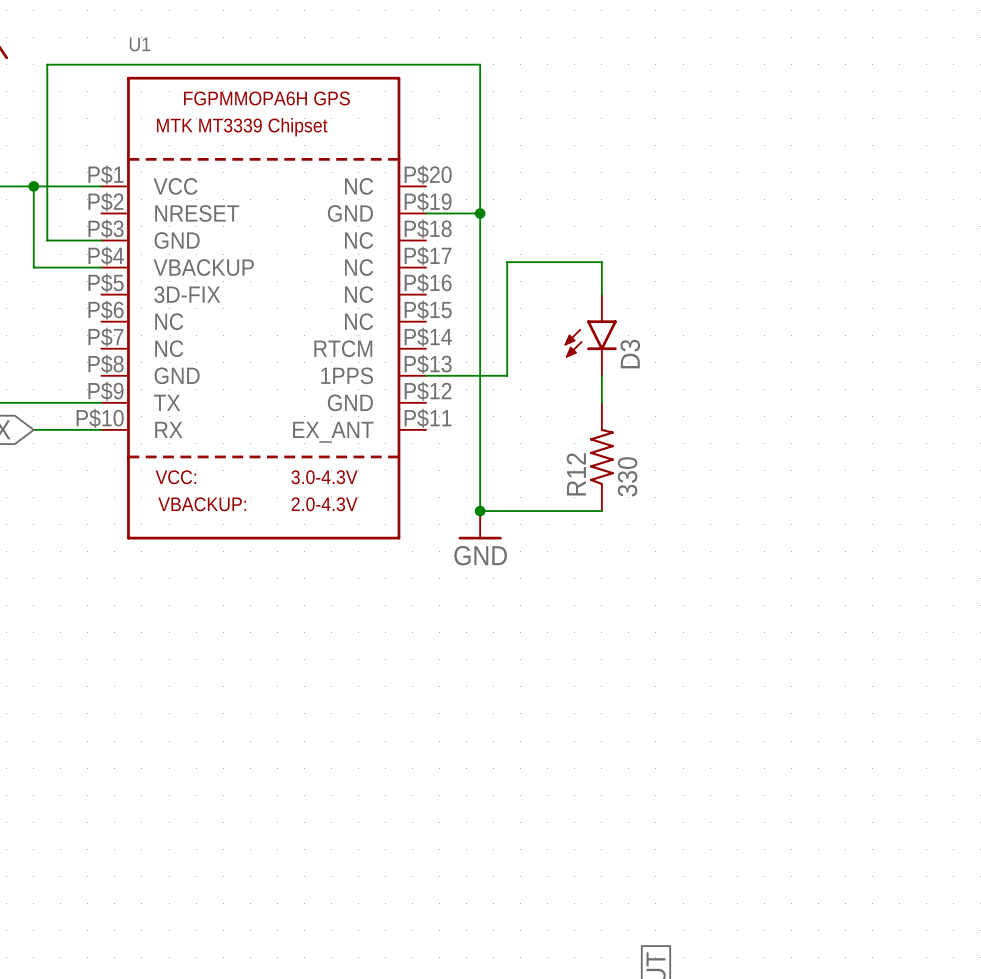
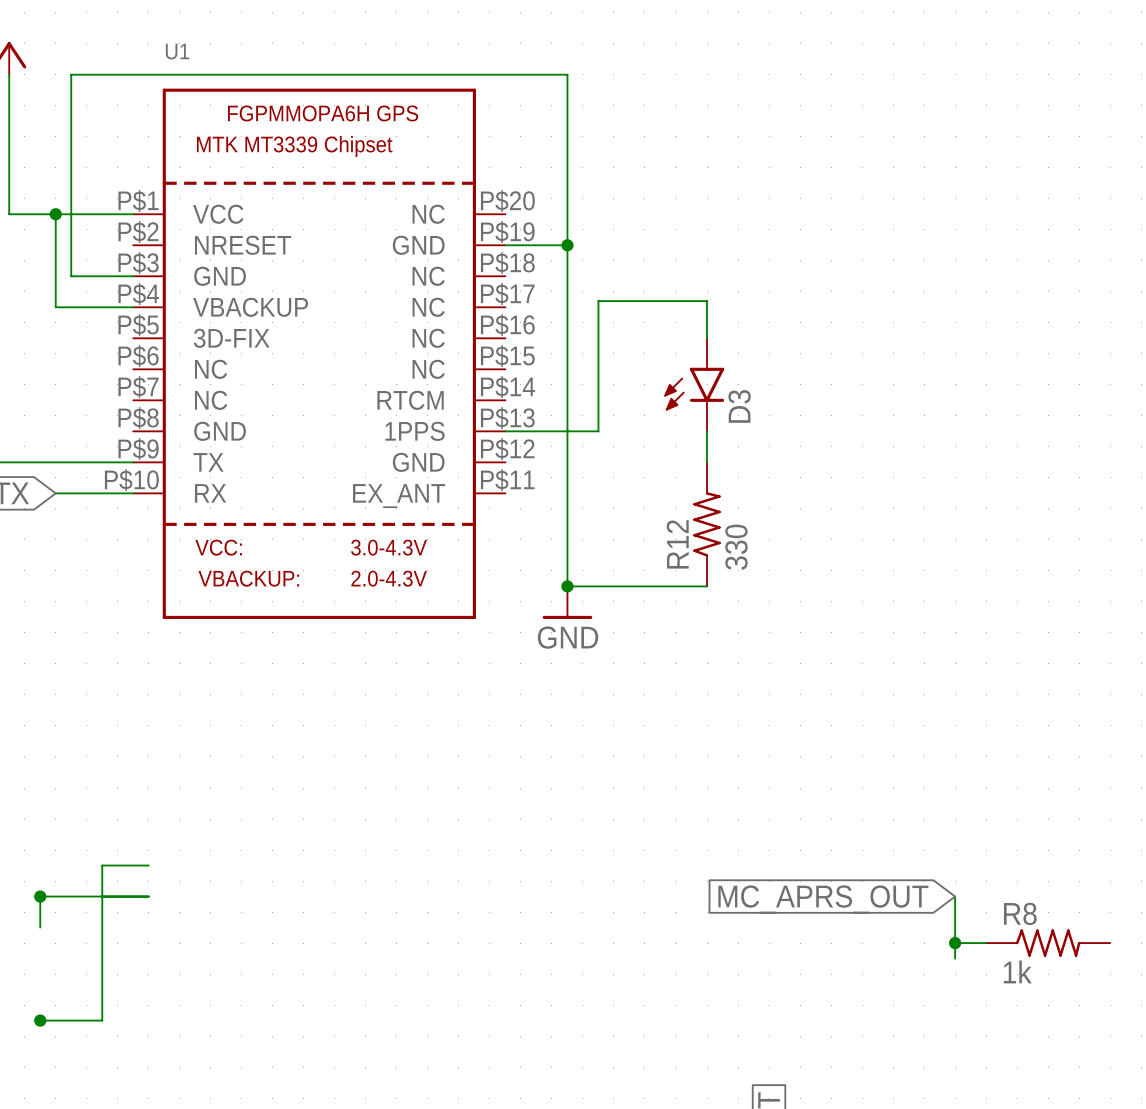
wire: none -> (148, 865) (102, 865) (102, 1020) (40, 1020)
junction: none -> (40, 896)
wire: none -> (148, 896) (40, 896) (40, 927)
wire: none -> (955, 896) (955, 958)
global label: none -> MC_APRS_OUT (823, 899)
wire: none -> (955, 943) (986, 943)
junction: none -> (955, 943)
R8: none -> 1k (1048, 943)
junction: none -> (40, 1020)

